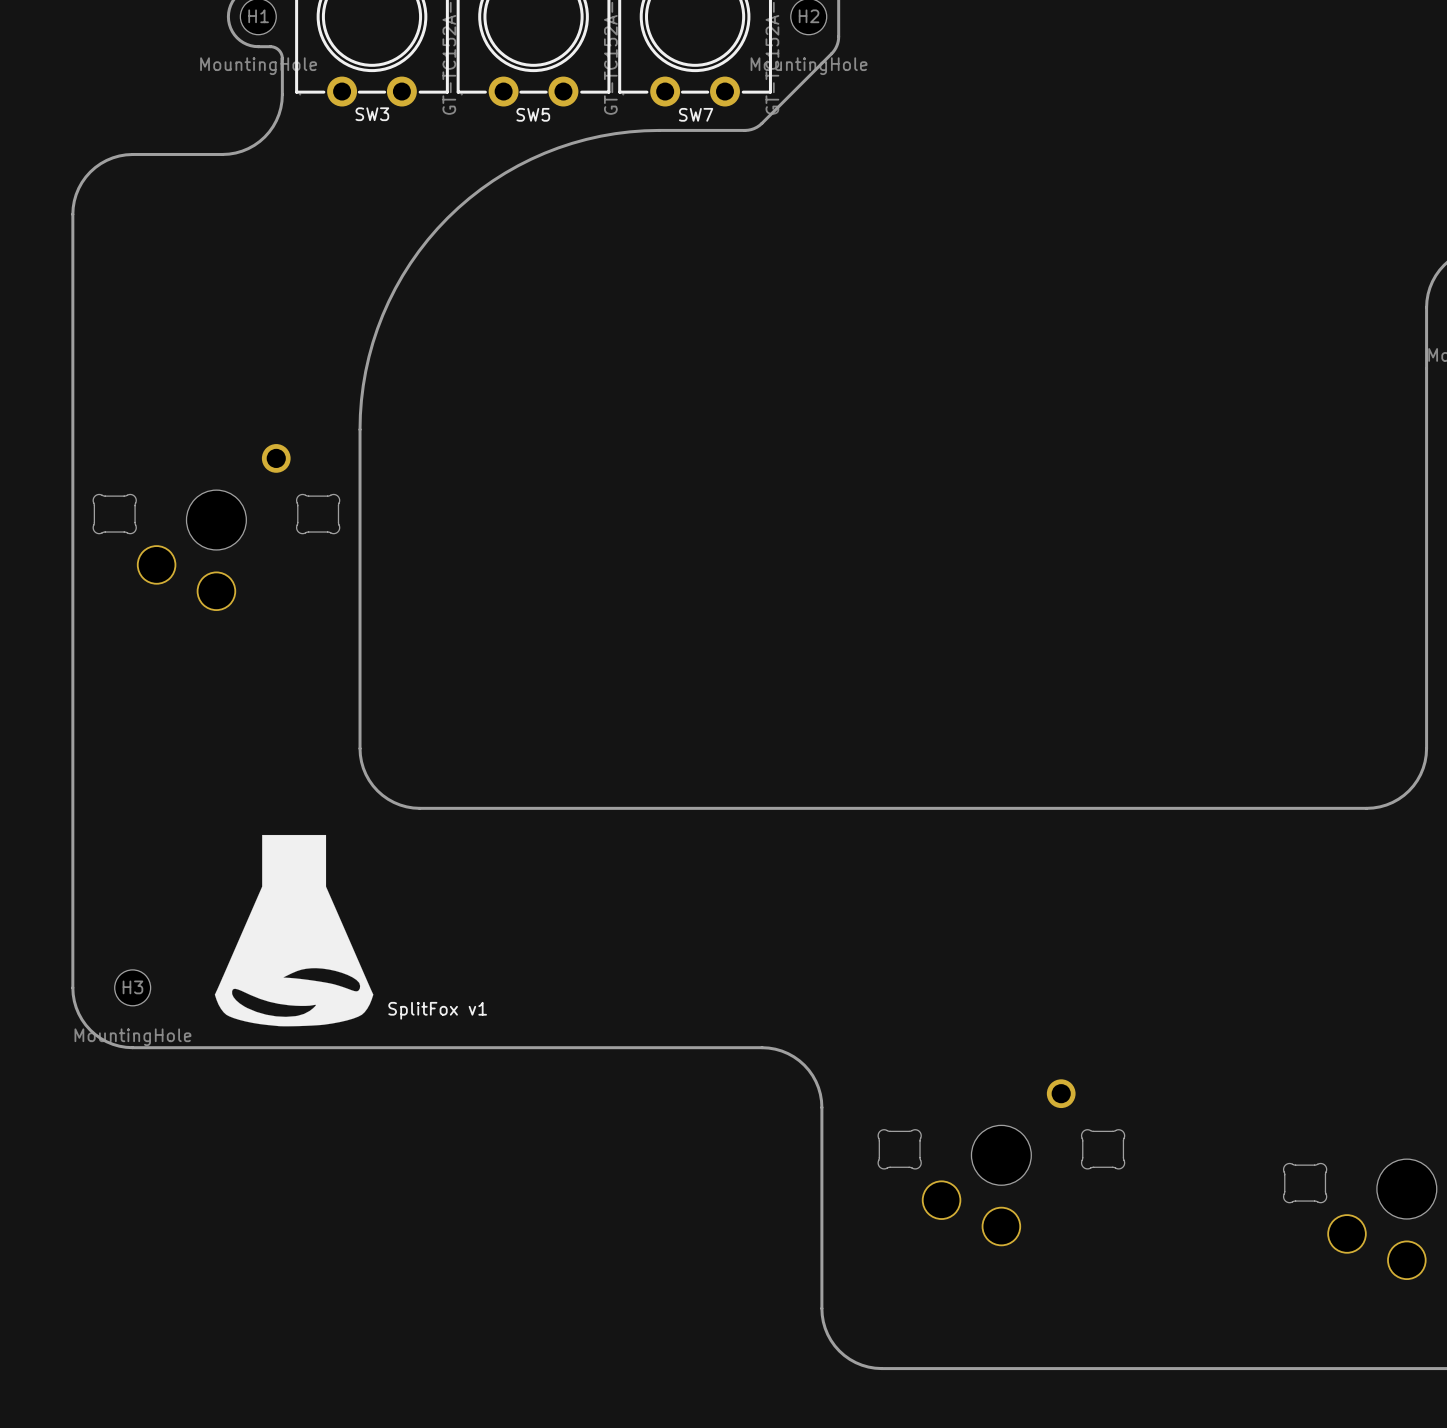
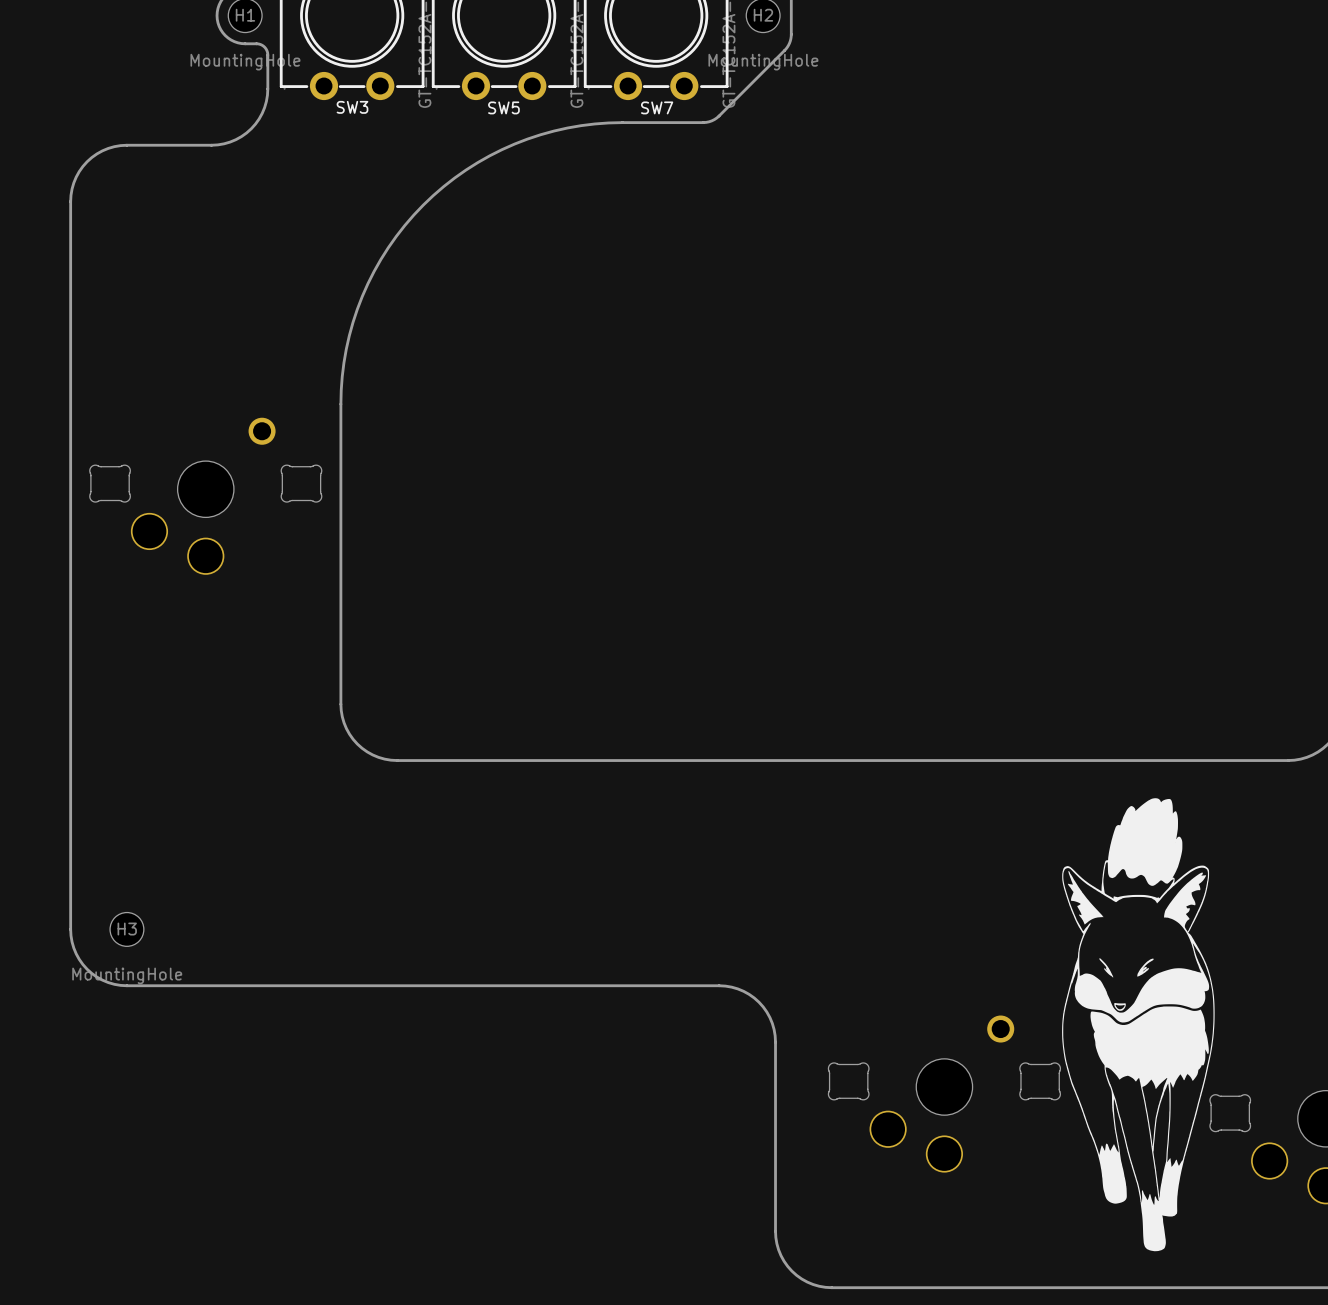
drawing: [214, 834, 374, 1027] -> none
drawing: none -> [1062, 798, 1215, 1252]
text: SplitFox v1 (437, 1010) -> none

